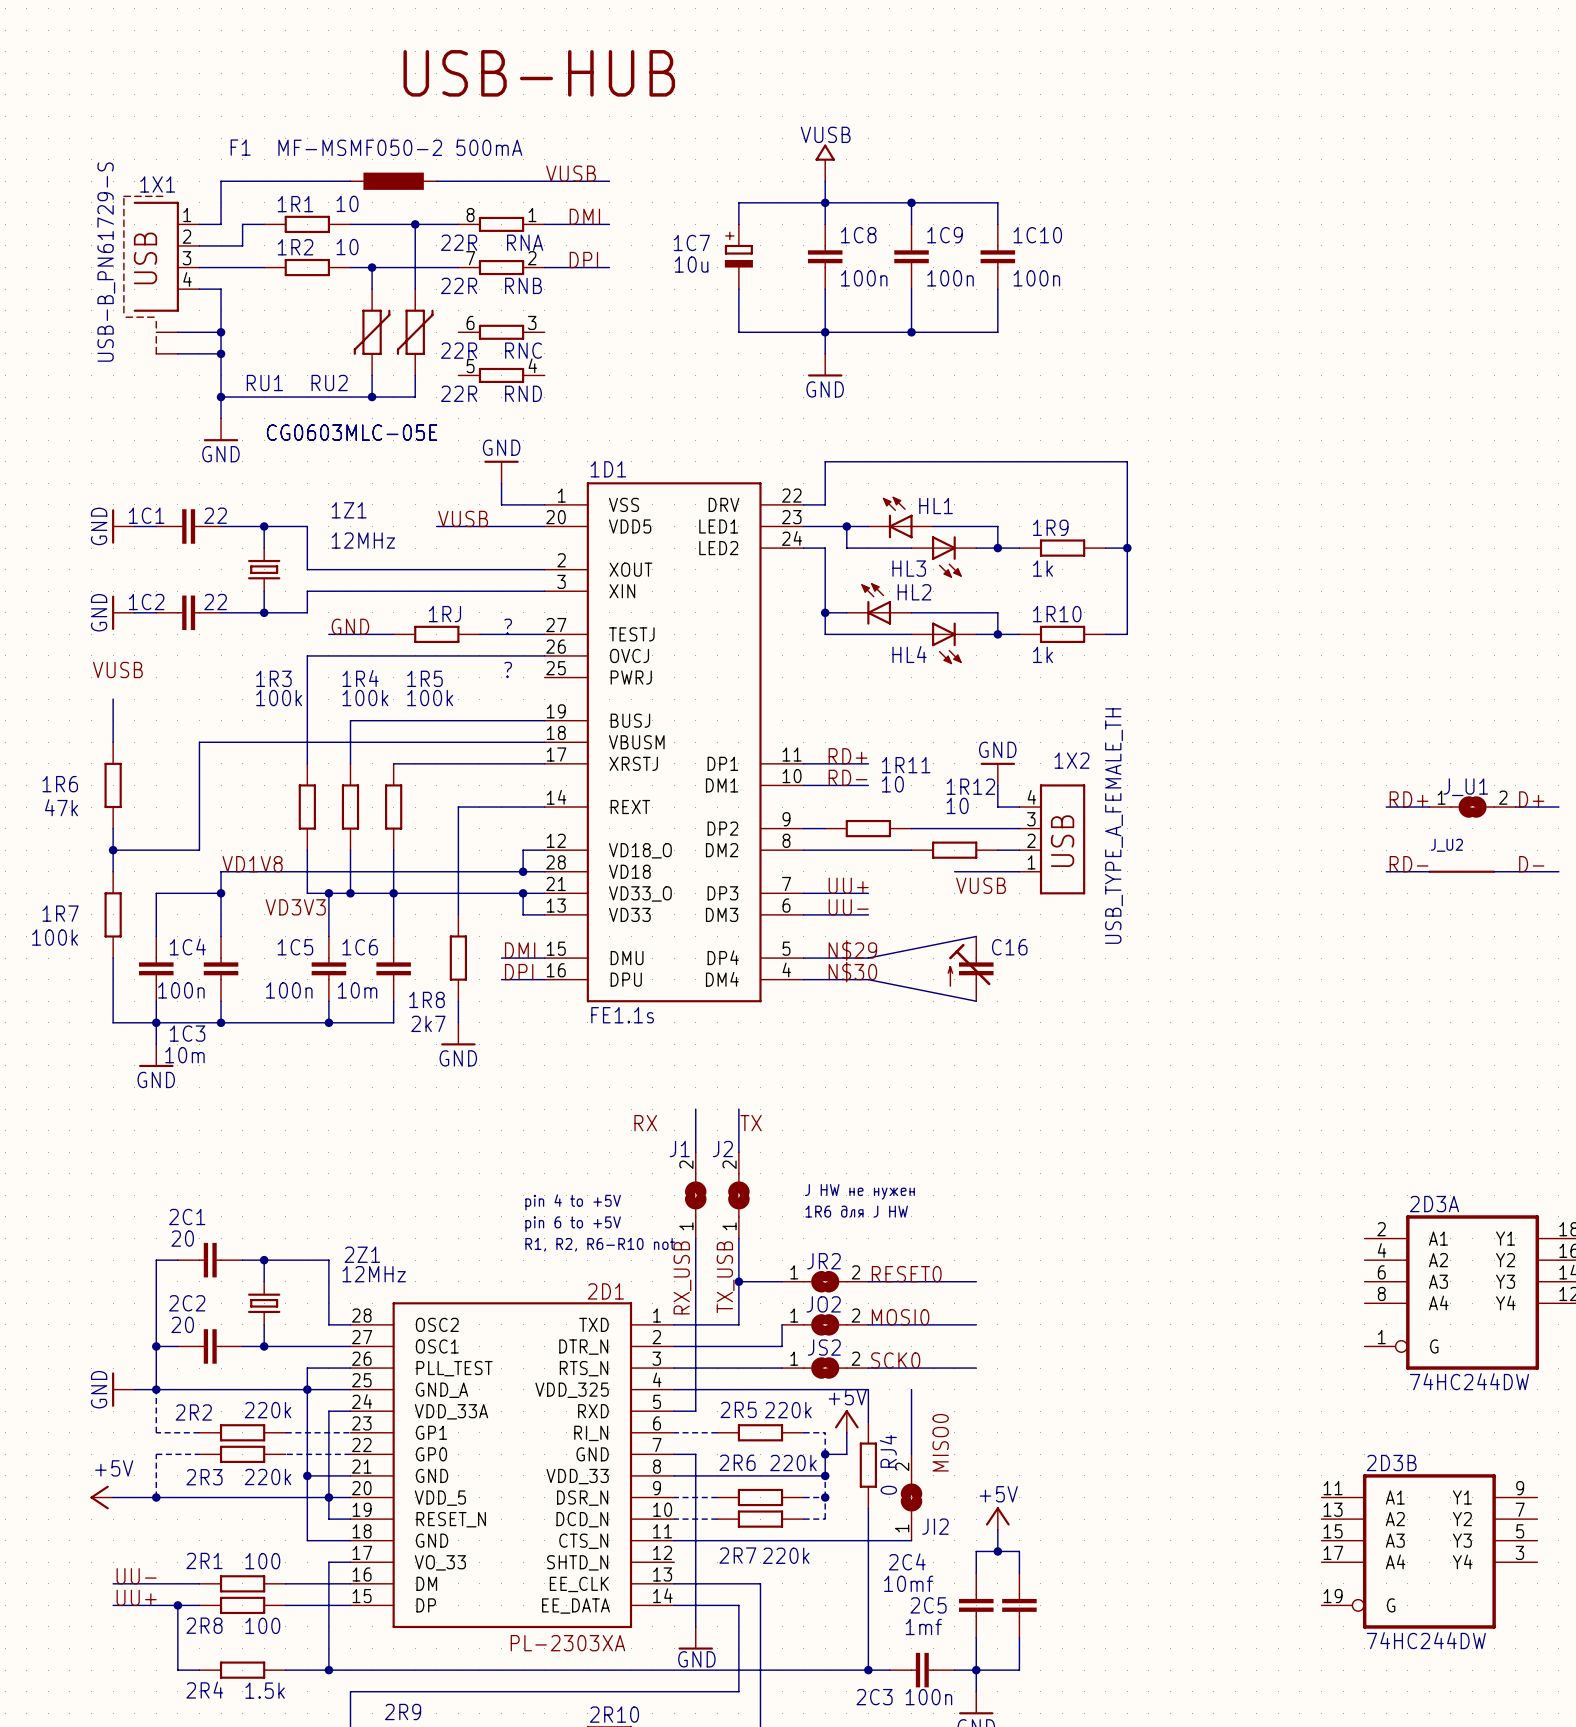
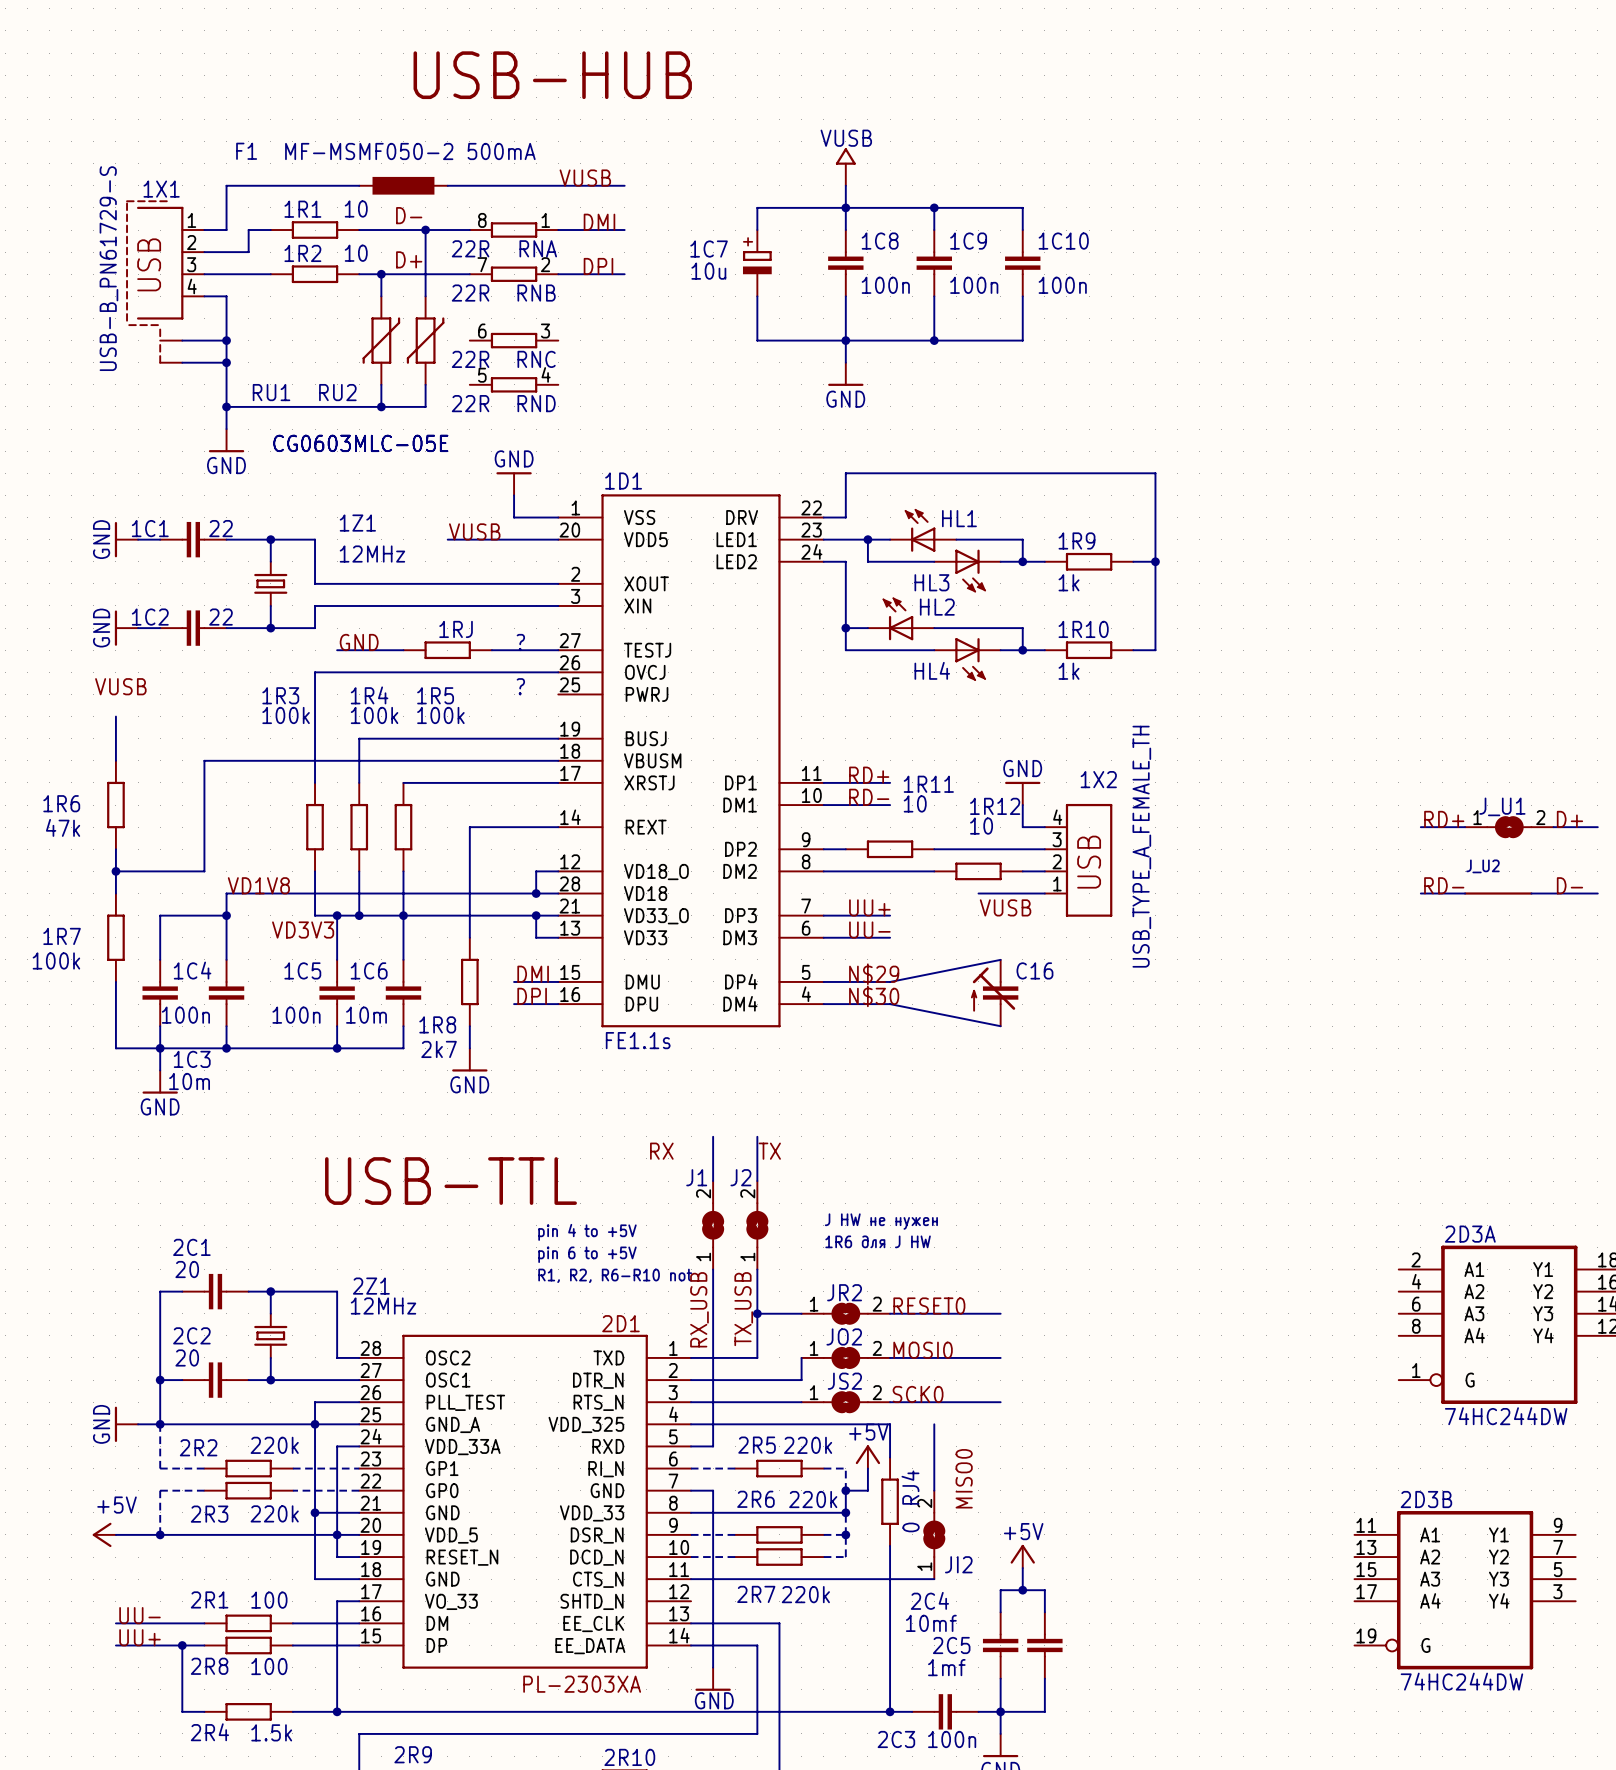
label: none -> D- (409, 215)
label: none -> D+ (409, 259)
text: none -> USB-TTL (450, 1181)

